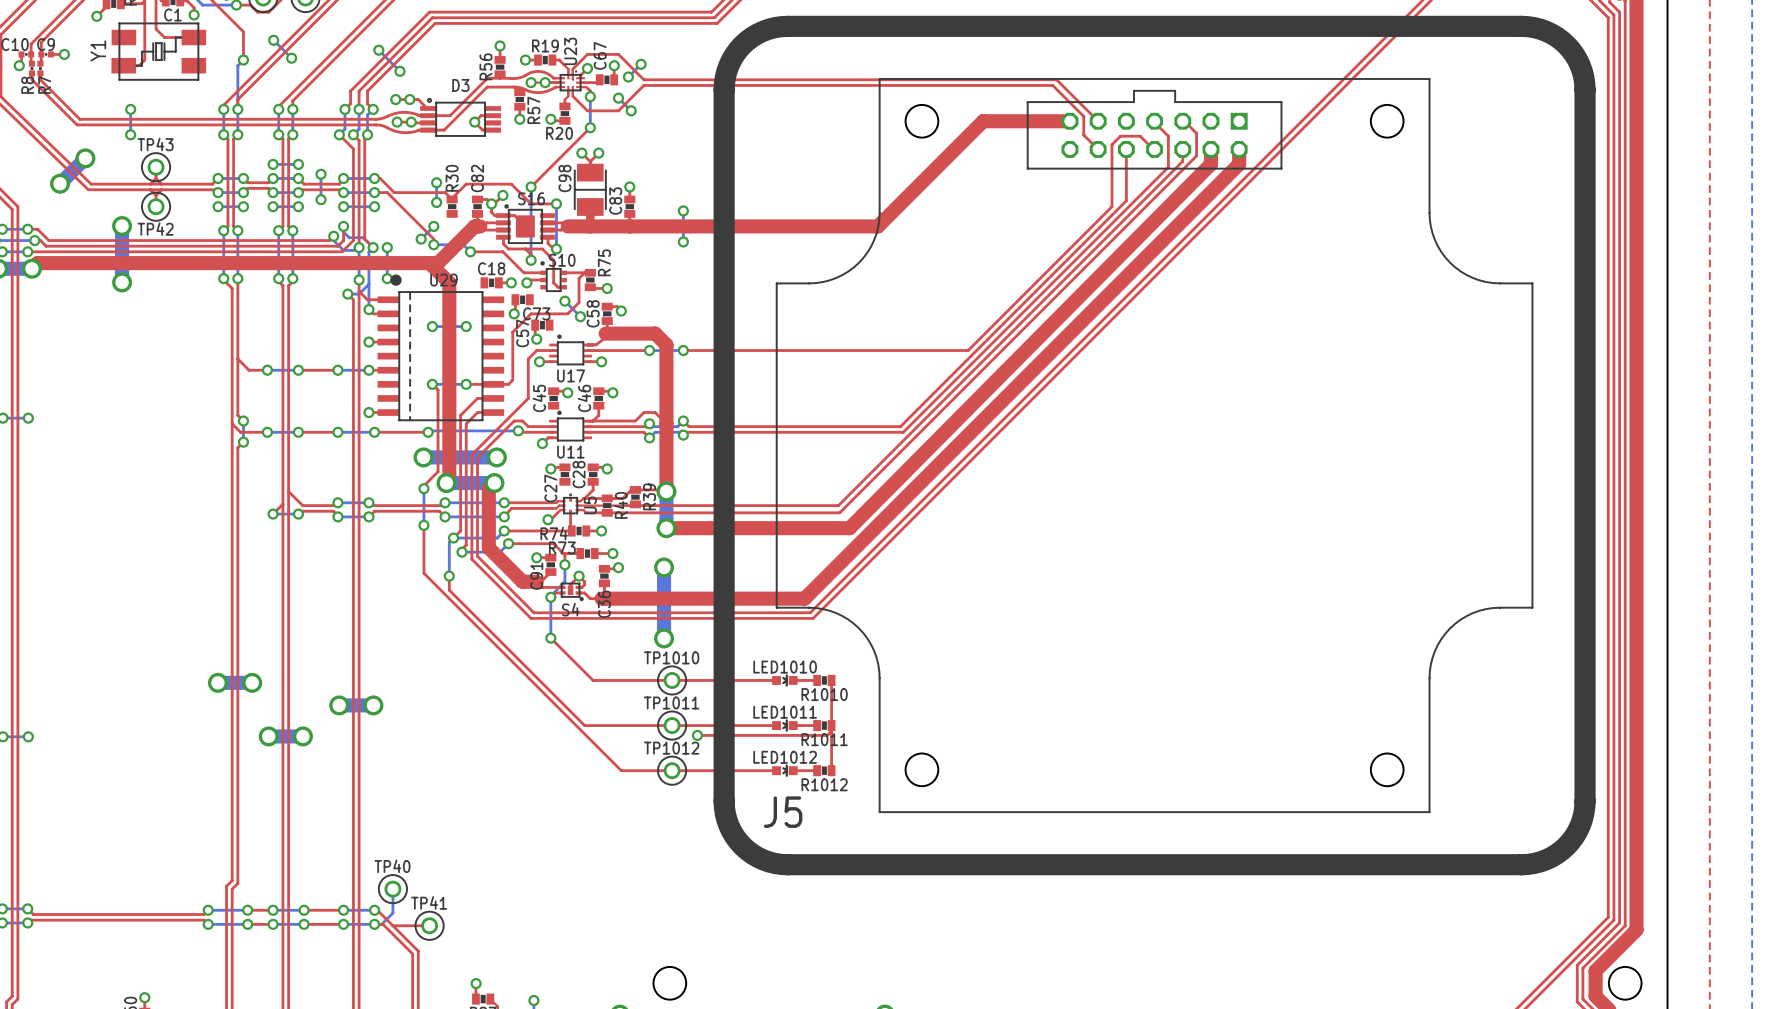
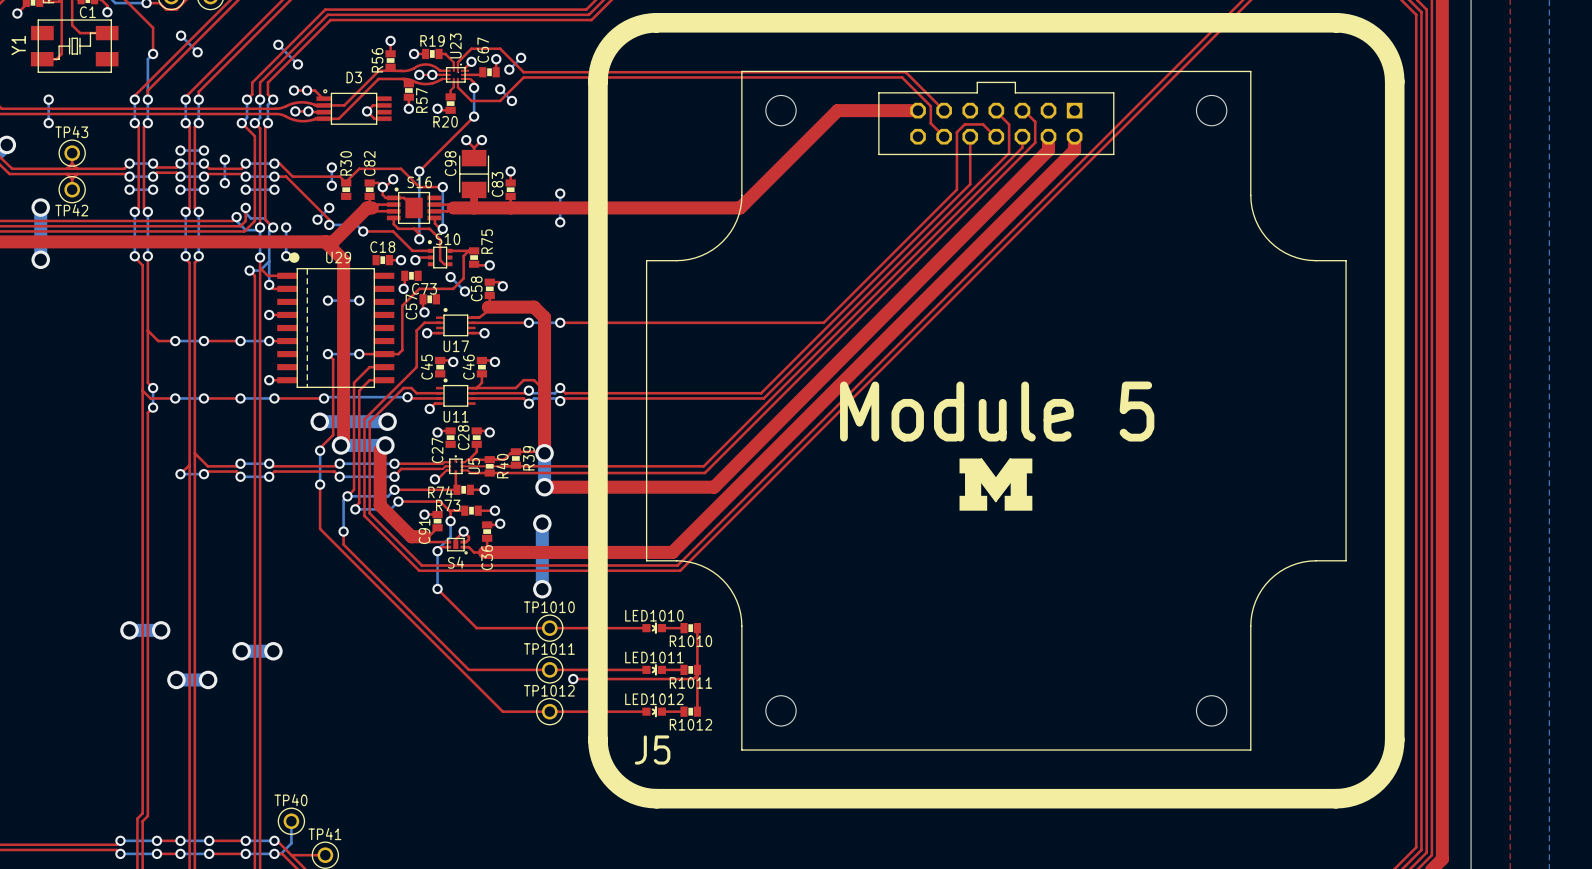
text: none -> Module 5 (997, 411)
drawing: none -> [959, 458, 1033, 511]

